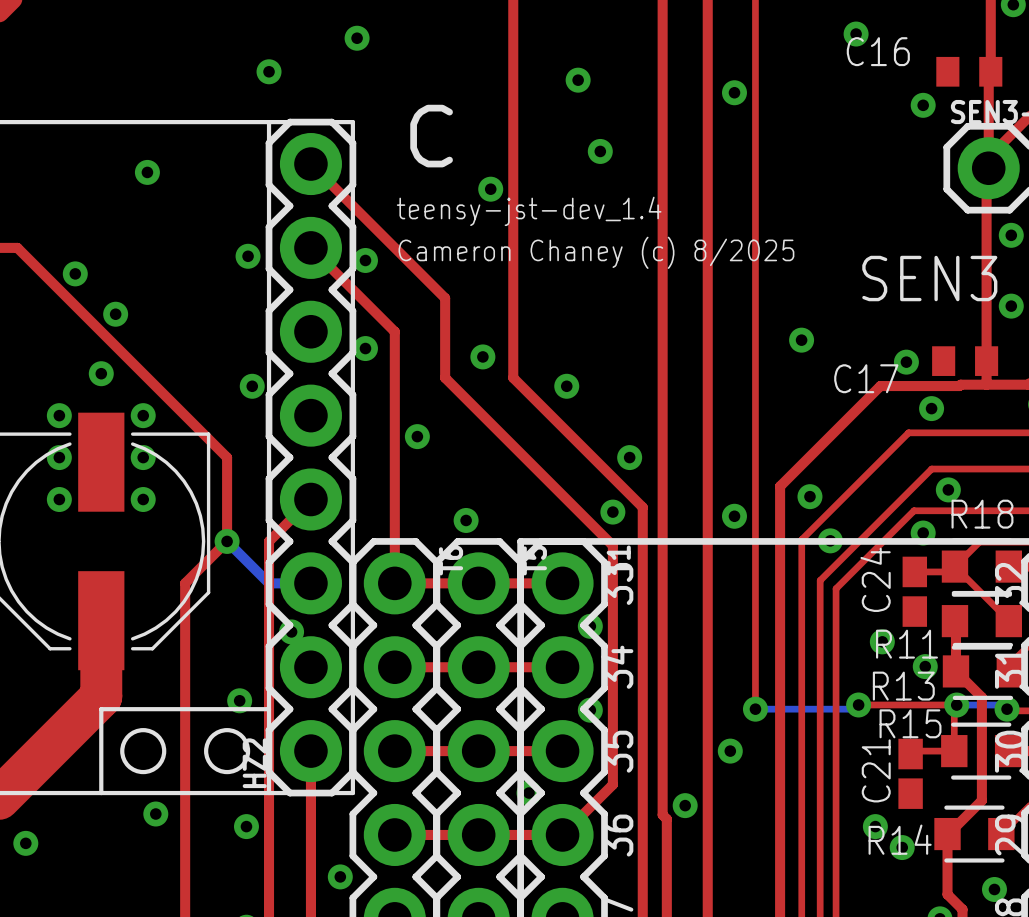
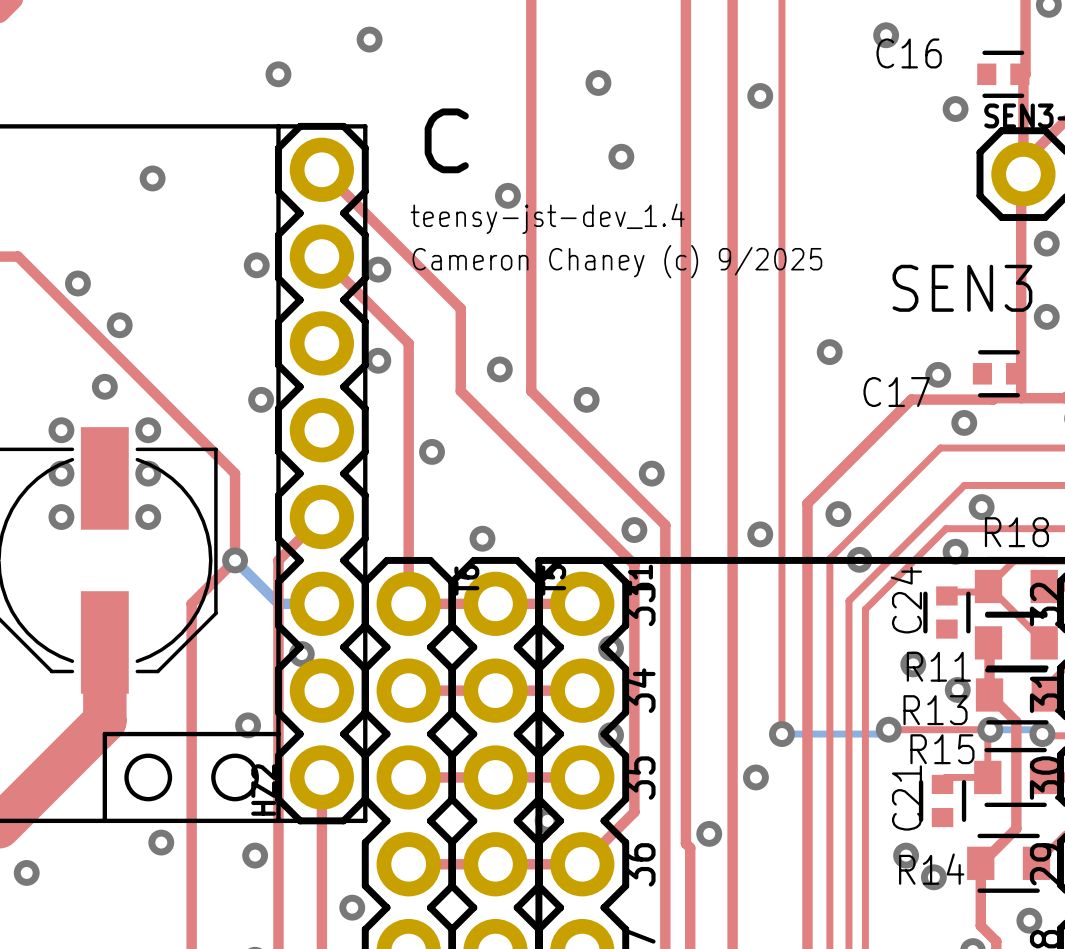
C16 footprint: [936, 56, 1003, 87] -> [977, 50, 1030, 98]
text: Cameron Chaney (c) 8/2025 (596, 252) -> Cameron Chaney (c) 9/2025 (617, 261)
C17 footprint: [932, 346, 999, 376] -> [972, 350, 1026, 398]
C24 footprint: [902, 556, 928, 627] -> [923, 586, 971, 639]
C21 footprint: [898, 738, 923, 809] -> [918, 774, 967, 828]

